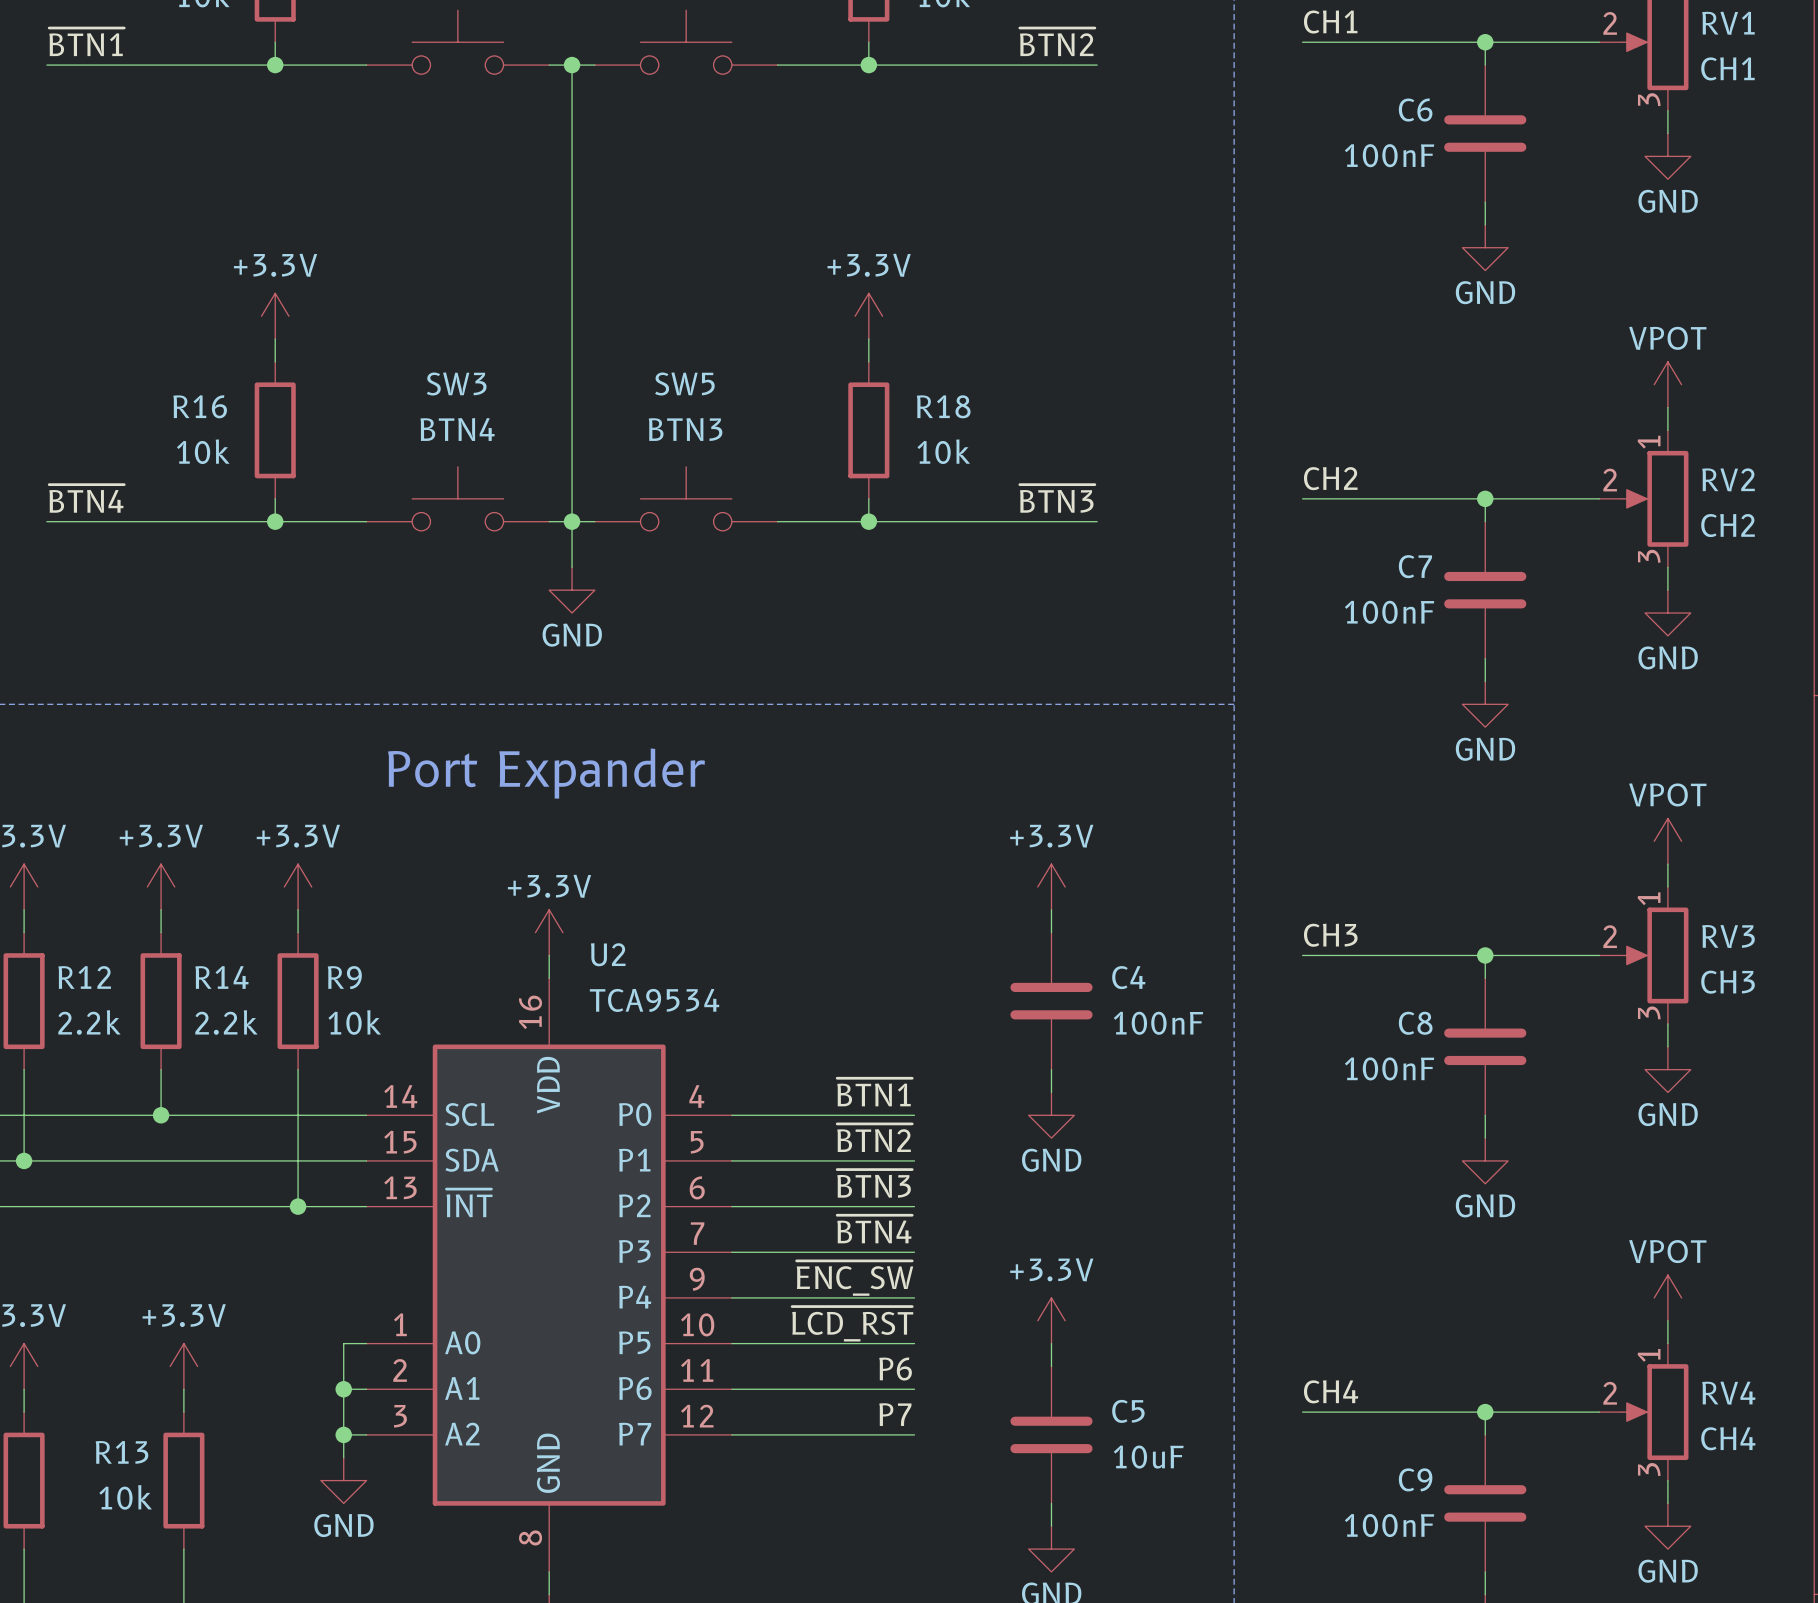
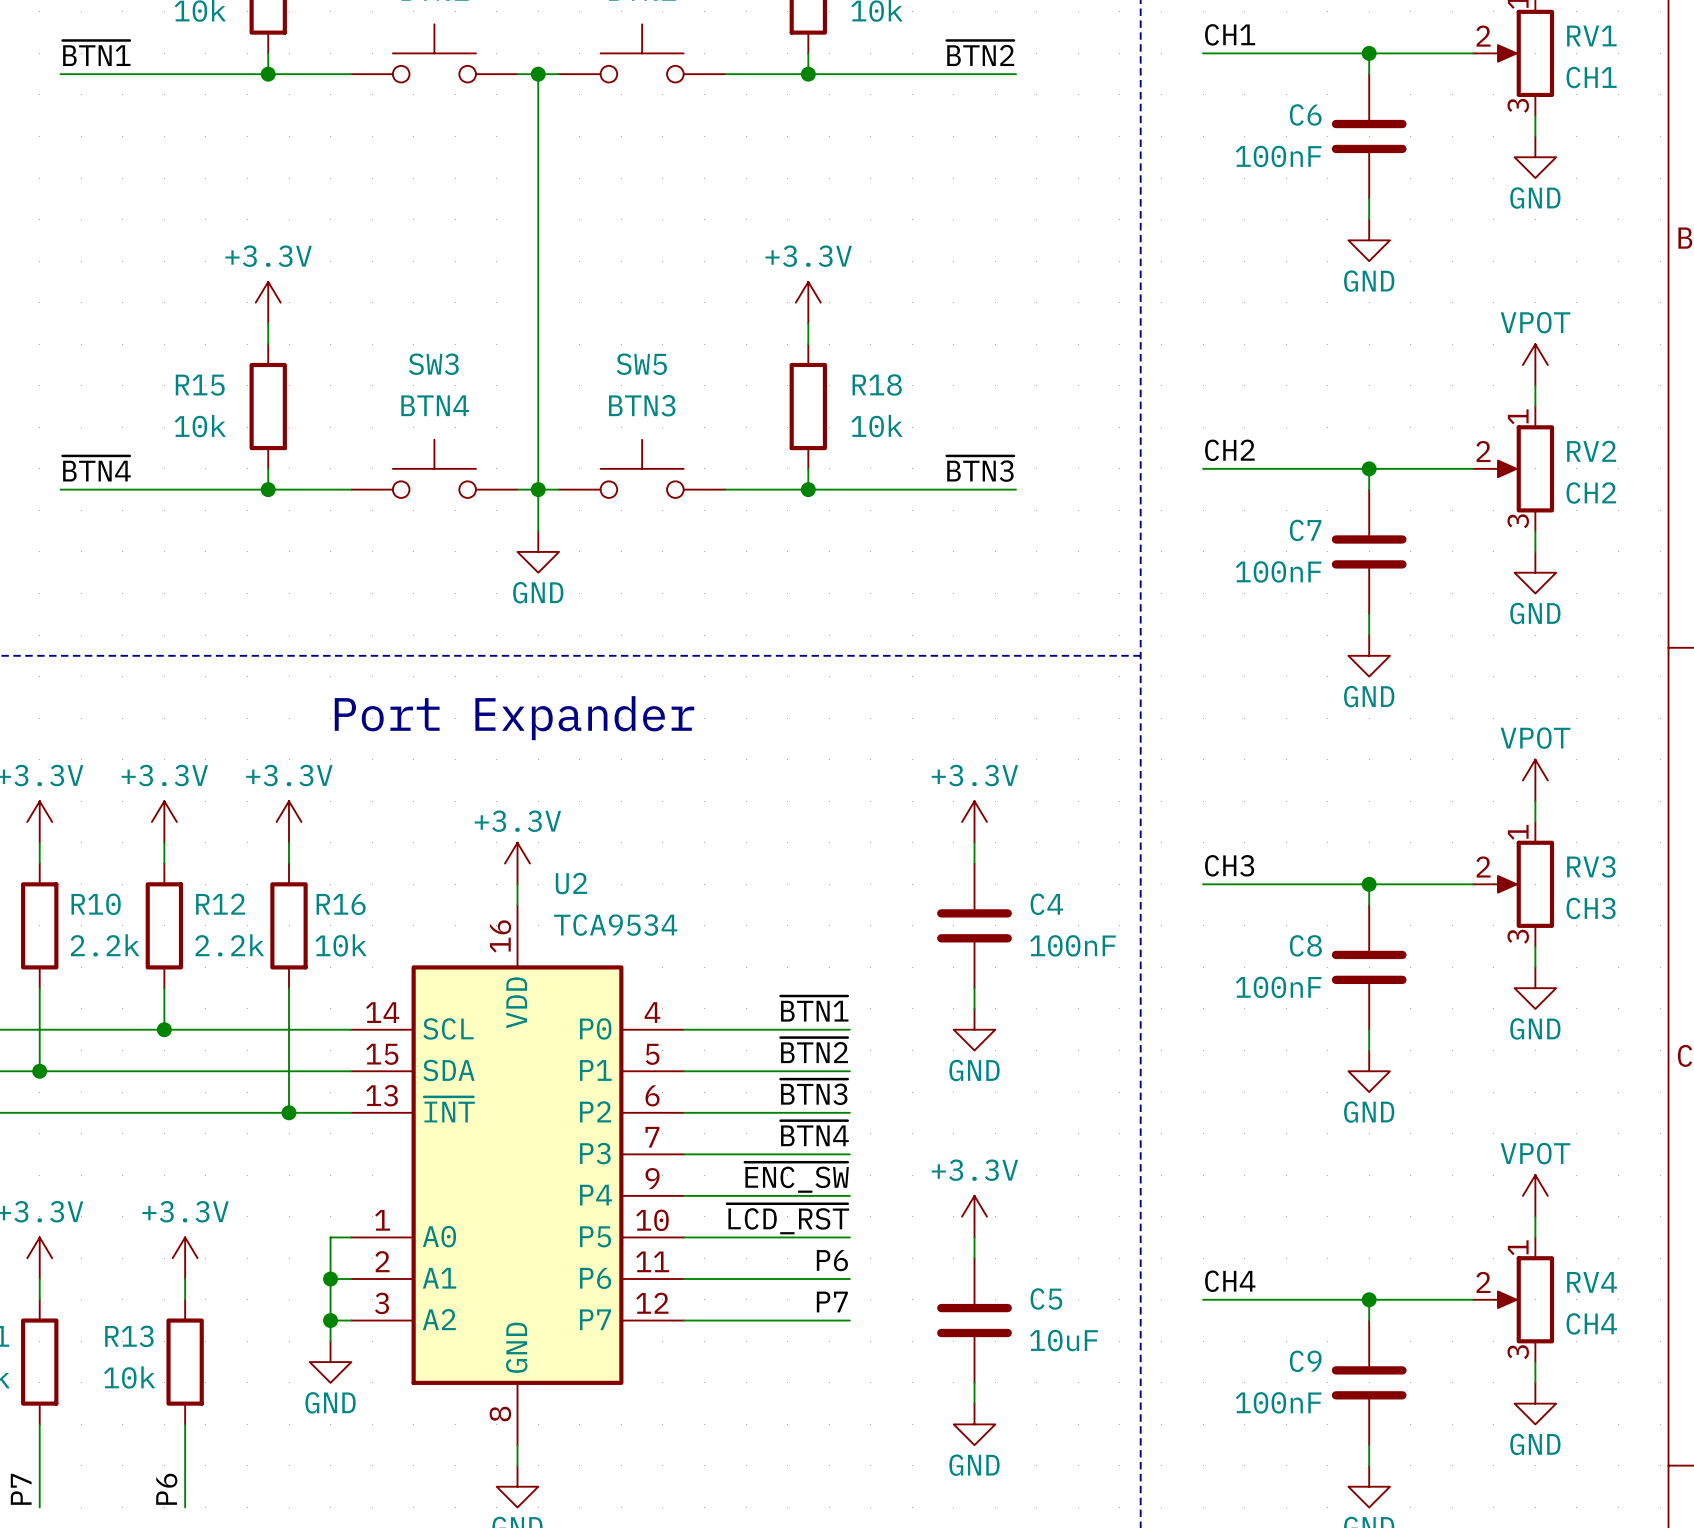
R16 name: R16 (200, 406) -> R15 (200, 385)
R12 name: R12 (84, 977) -> R10 (96, 904)
R14 name: R14 (221, 977) -> R12 (220, 904)
R9 name: R9 (344, 977) -> R16 (341, 904)

